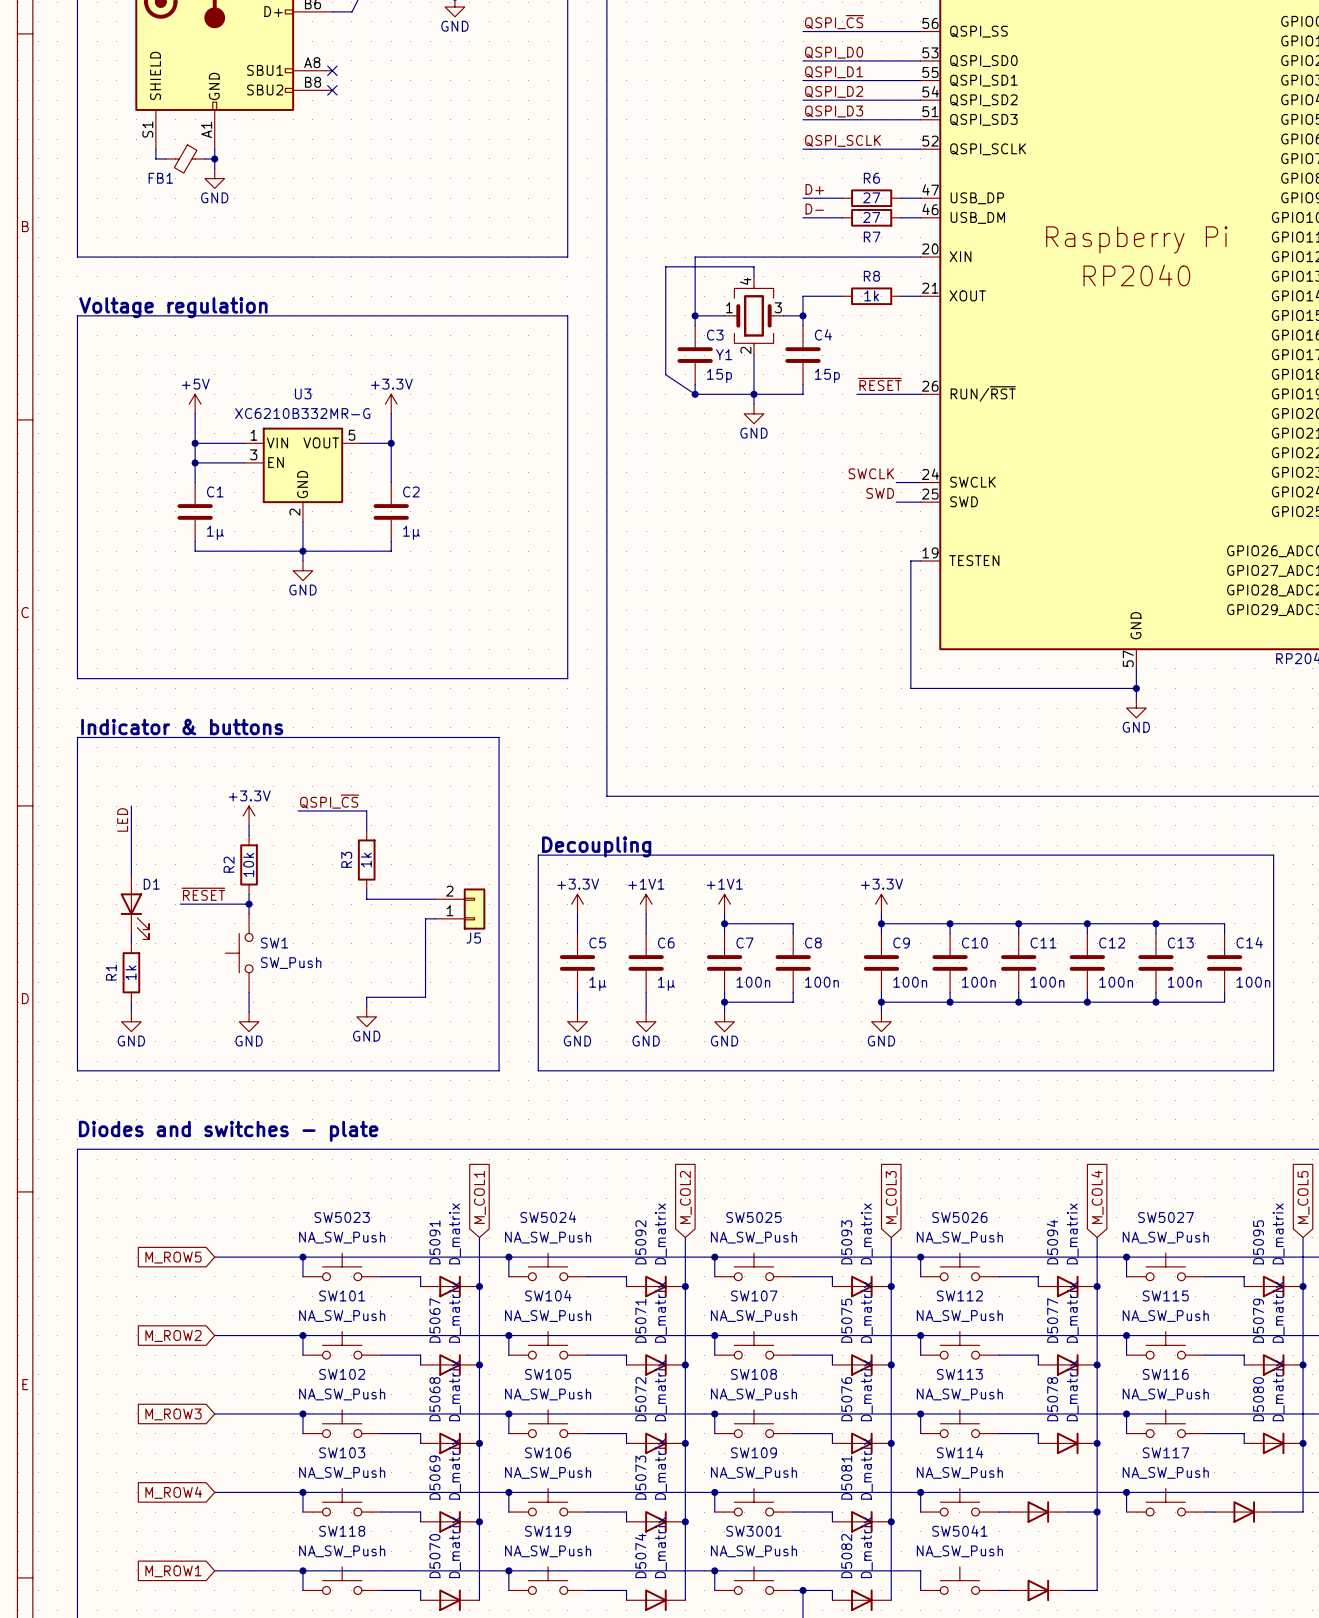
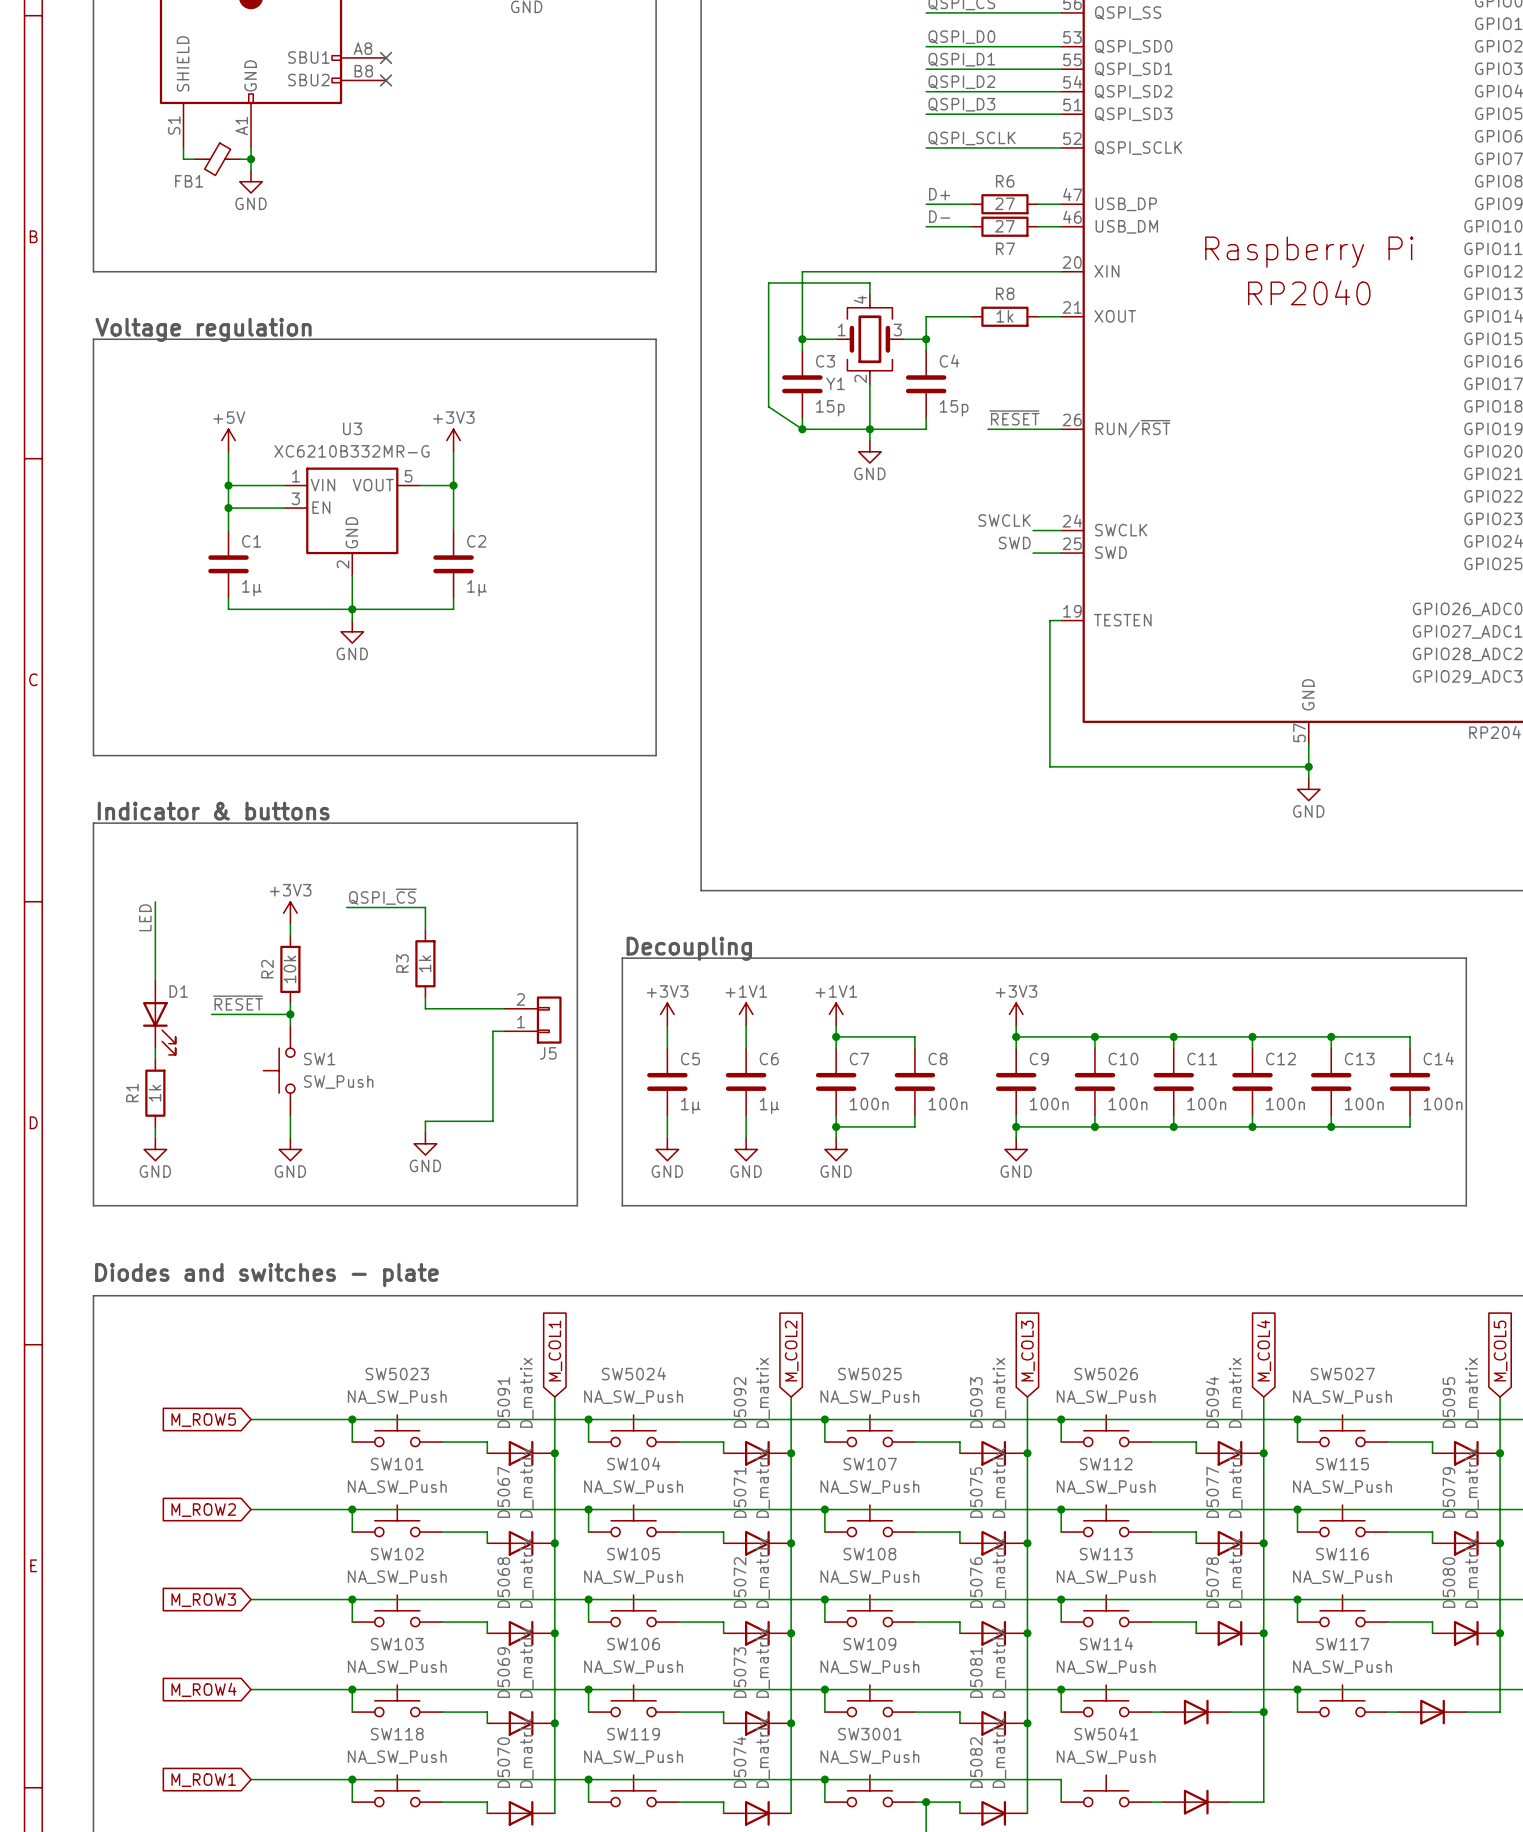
power symbol: +3.3V (391, 404) -> +3V3 (453, 440)
power symbol: +3.3V (249, 815) -> +3V3 (290, 913)
power symbol: +3.3V (577, 904) -> +3V3 (667, 1014)
power symbol: +3.3V (881, 904) -> +3V3 (1016, 1014)

